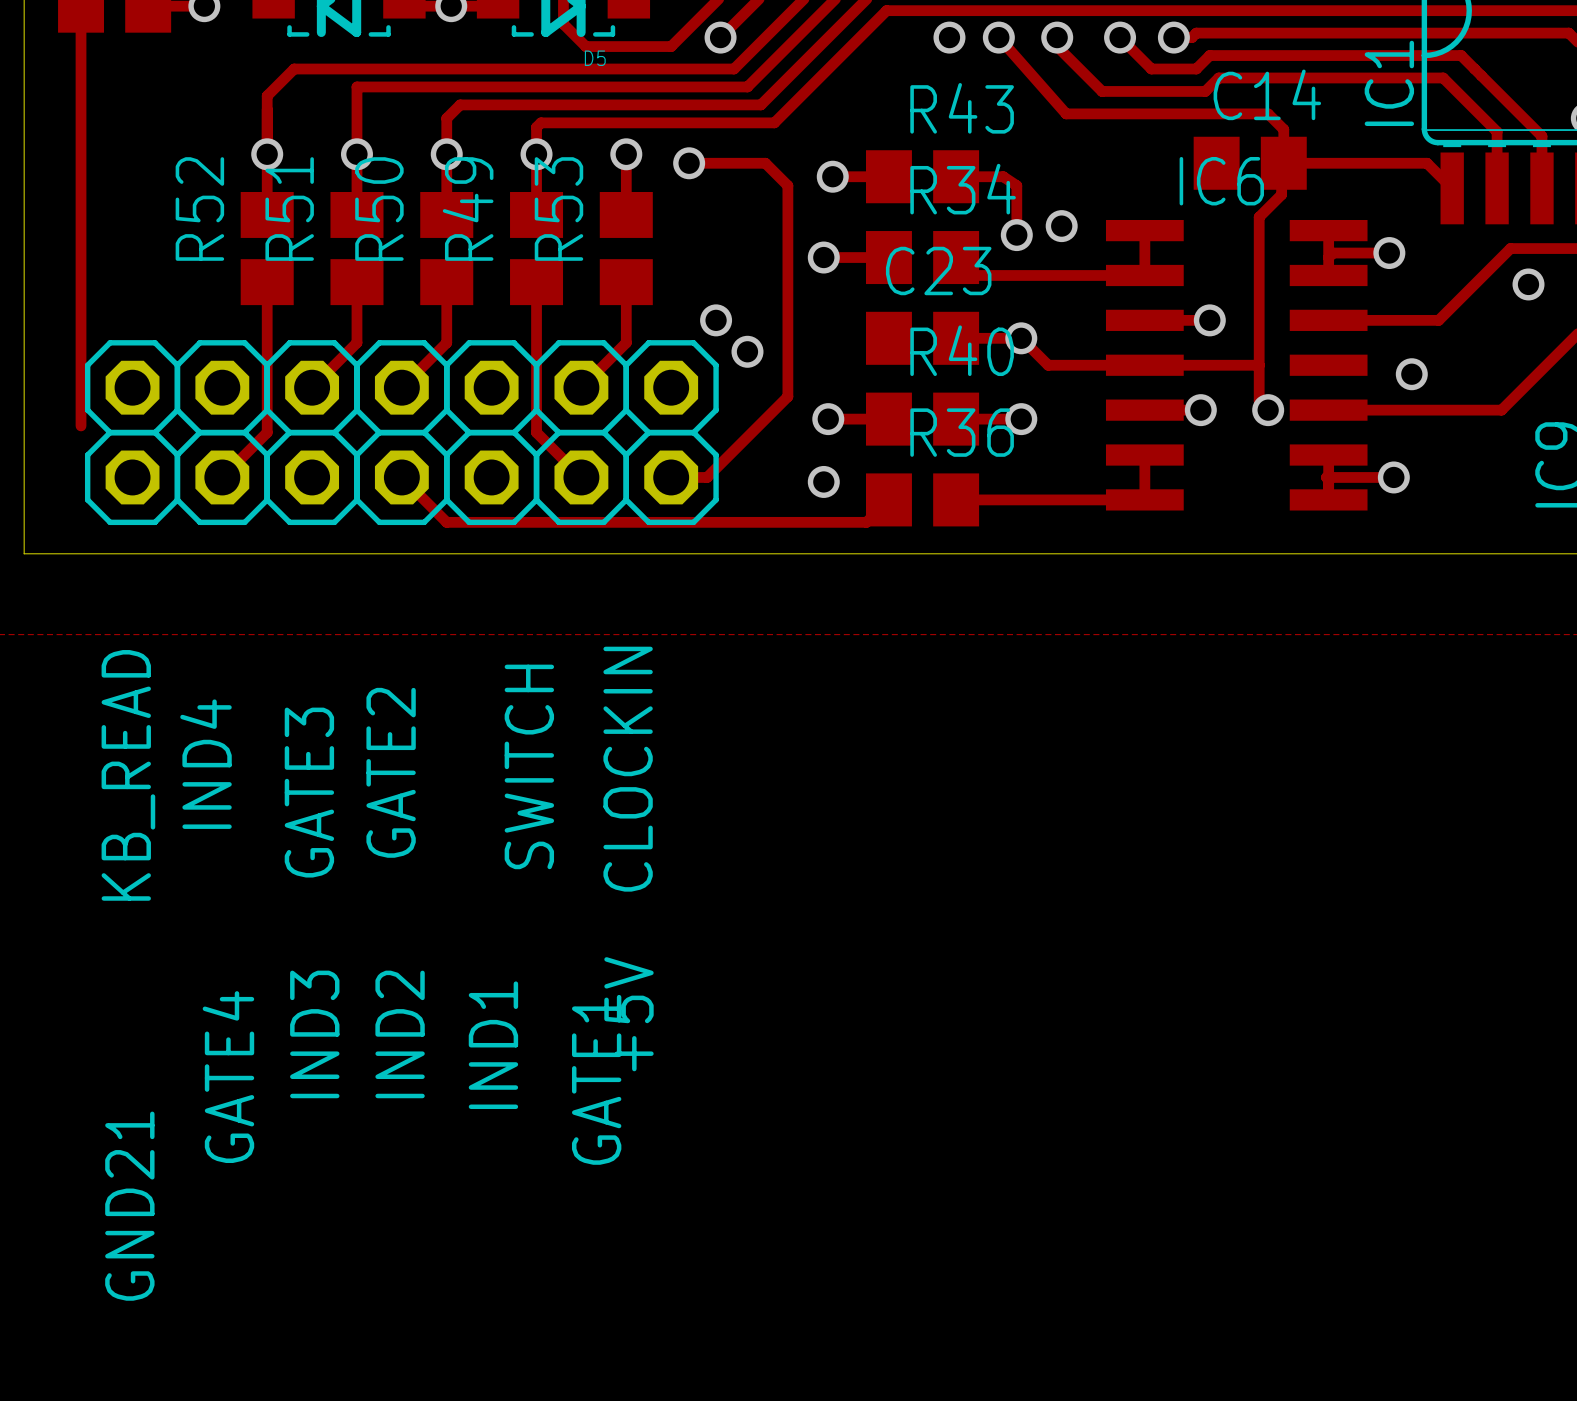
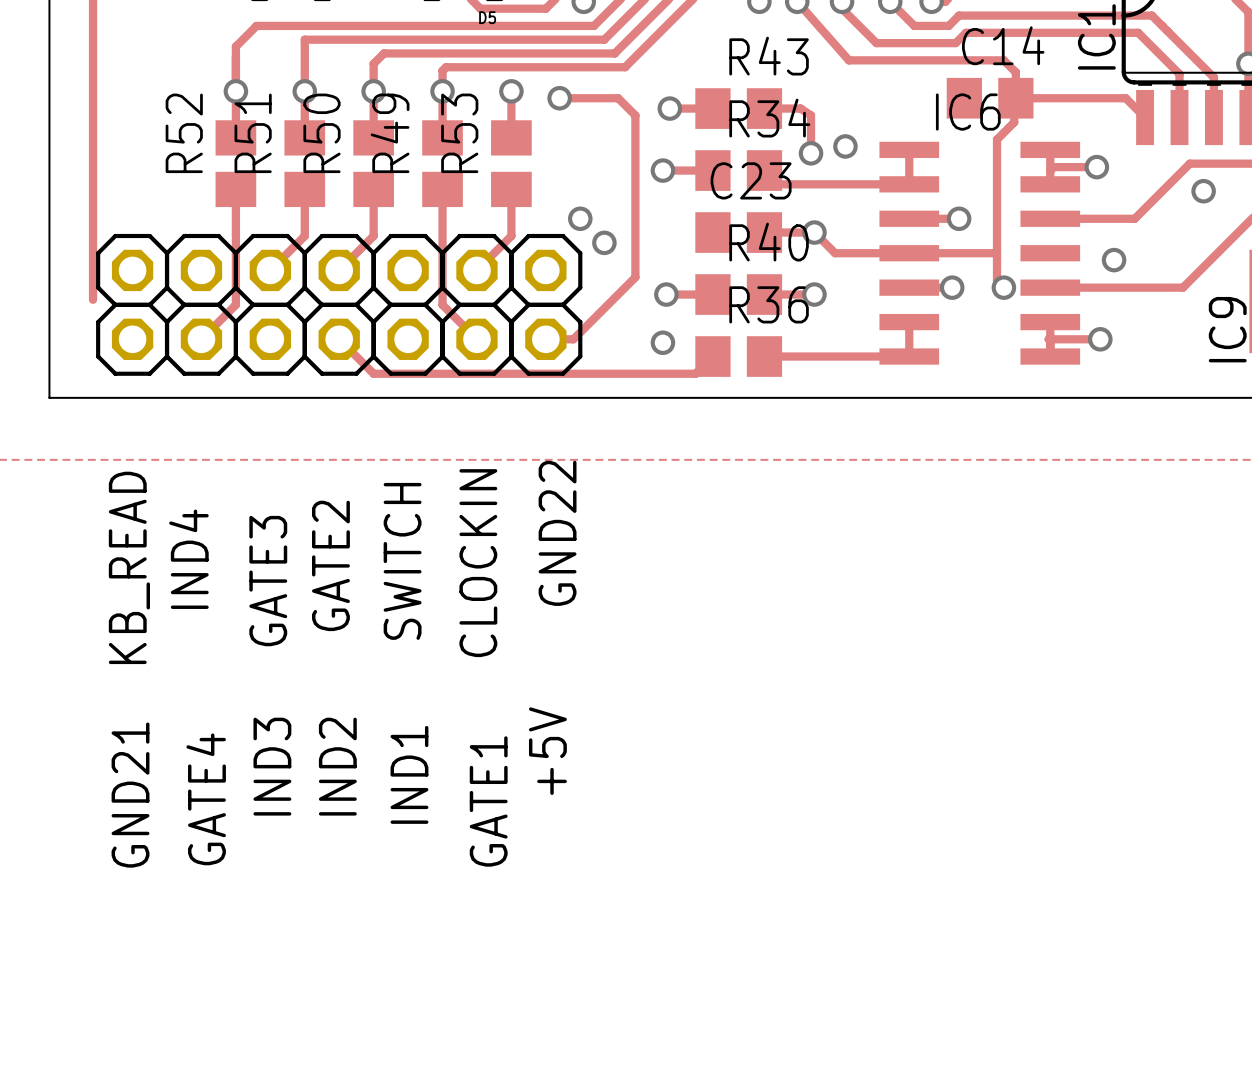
GND22 name: none -> GND22 (557, 533)
SWITCH name position: SWITCH (529, 766) -> SWITCH (402, 561)
CLOCKIN name position: CLOCKIN (628, 769) -> CLOCKIN (478, 563)
+5V name position: +5V (628, 1014) -> +5V (547, 751)
GND21 name position: GND21 (129, 1206) -> GND21 (130, 795)

